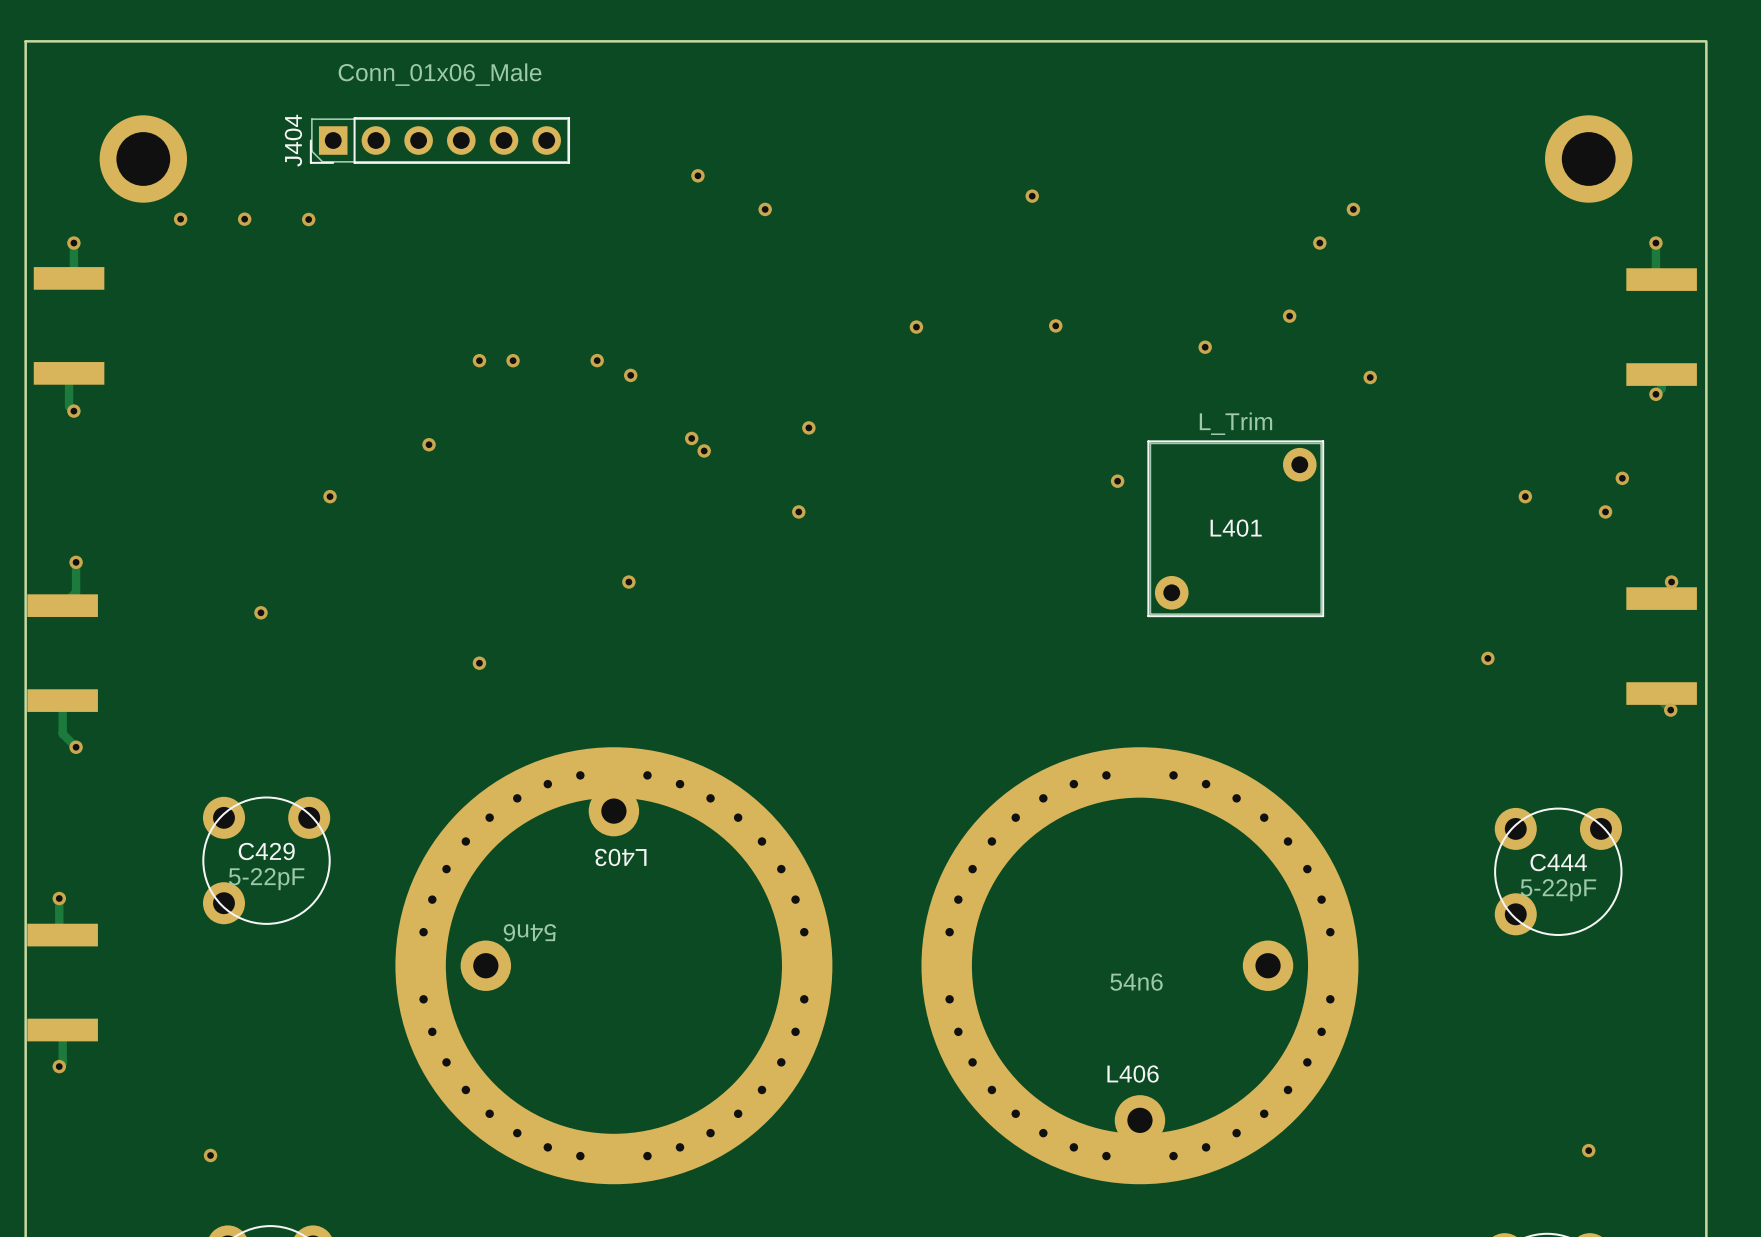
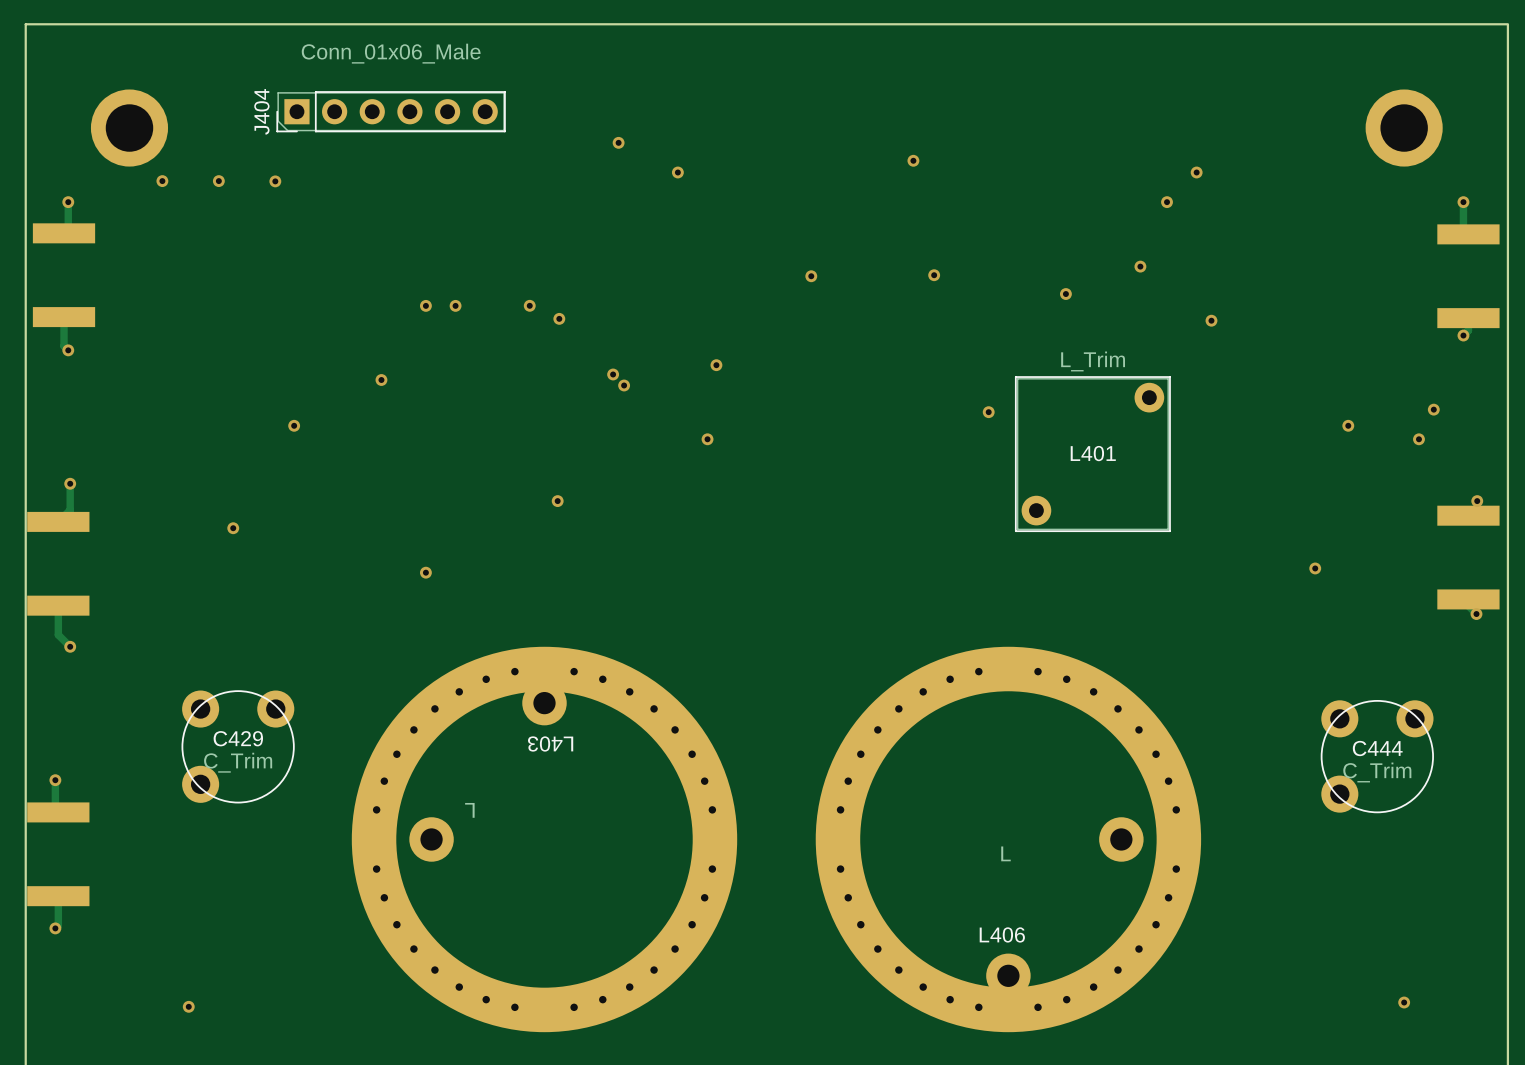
C429 value: 5-22pF (266, 879) -> C_Trim (238, 762)
C444 value: 5-22pF (1558, 890) -> C_Trim (1377, 772)
L403 value: 54n6 (529, 932) -> L (469, 810)
L406 value: 54n6 (1136, 982) -> L (1005, 853)

